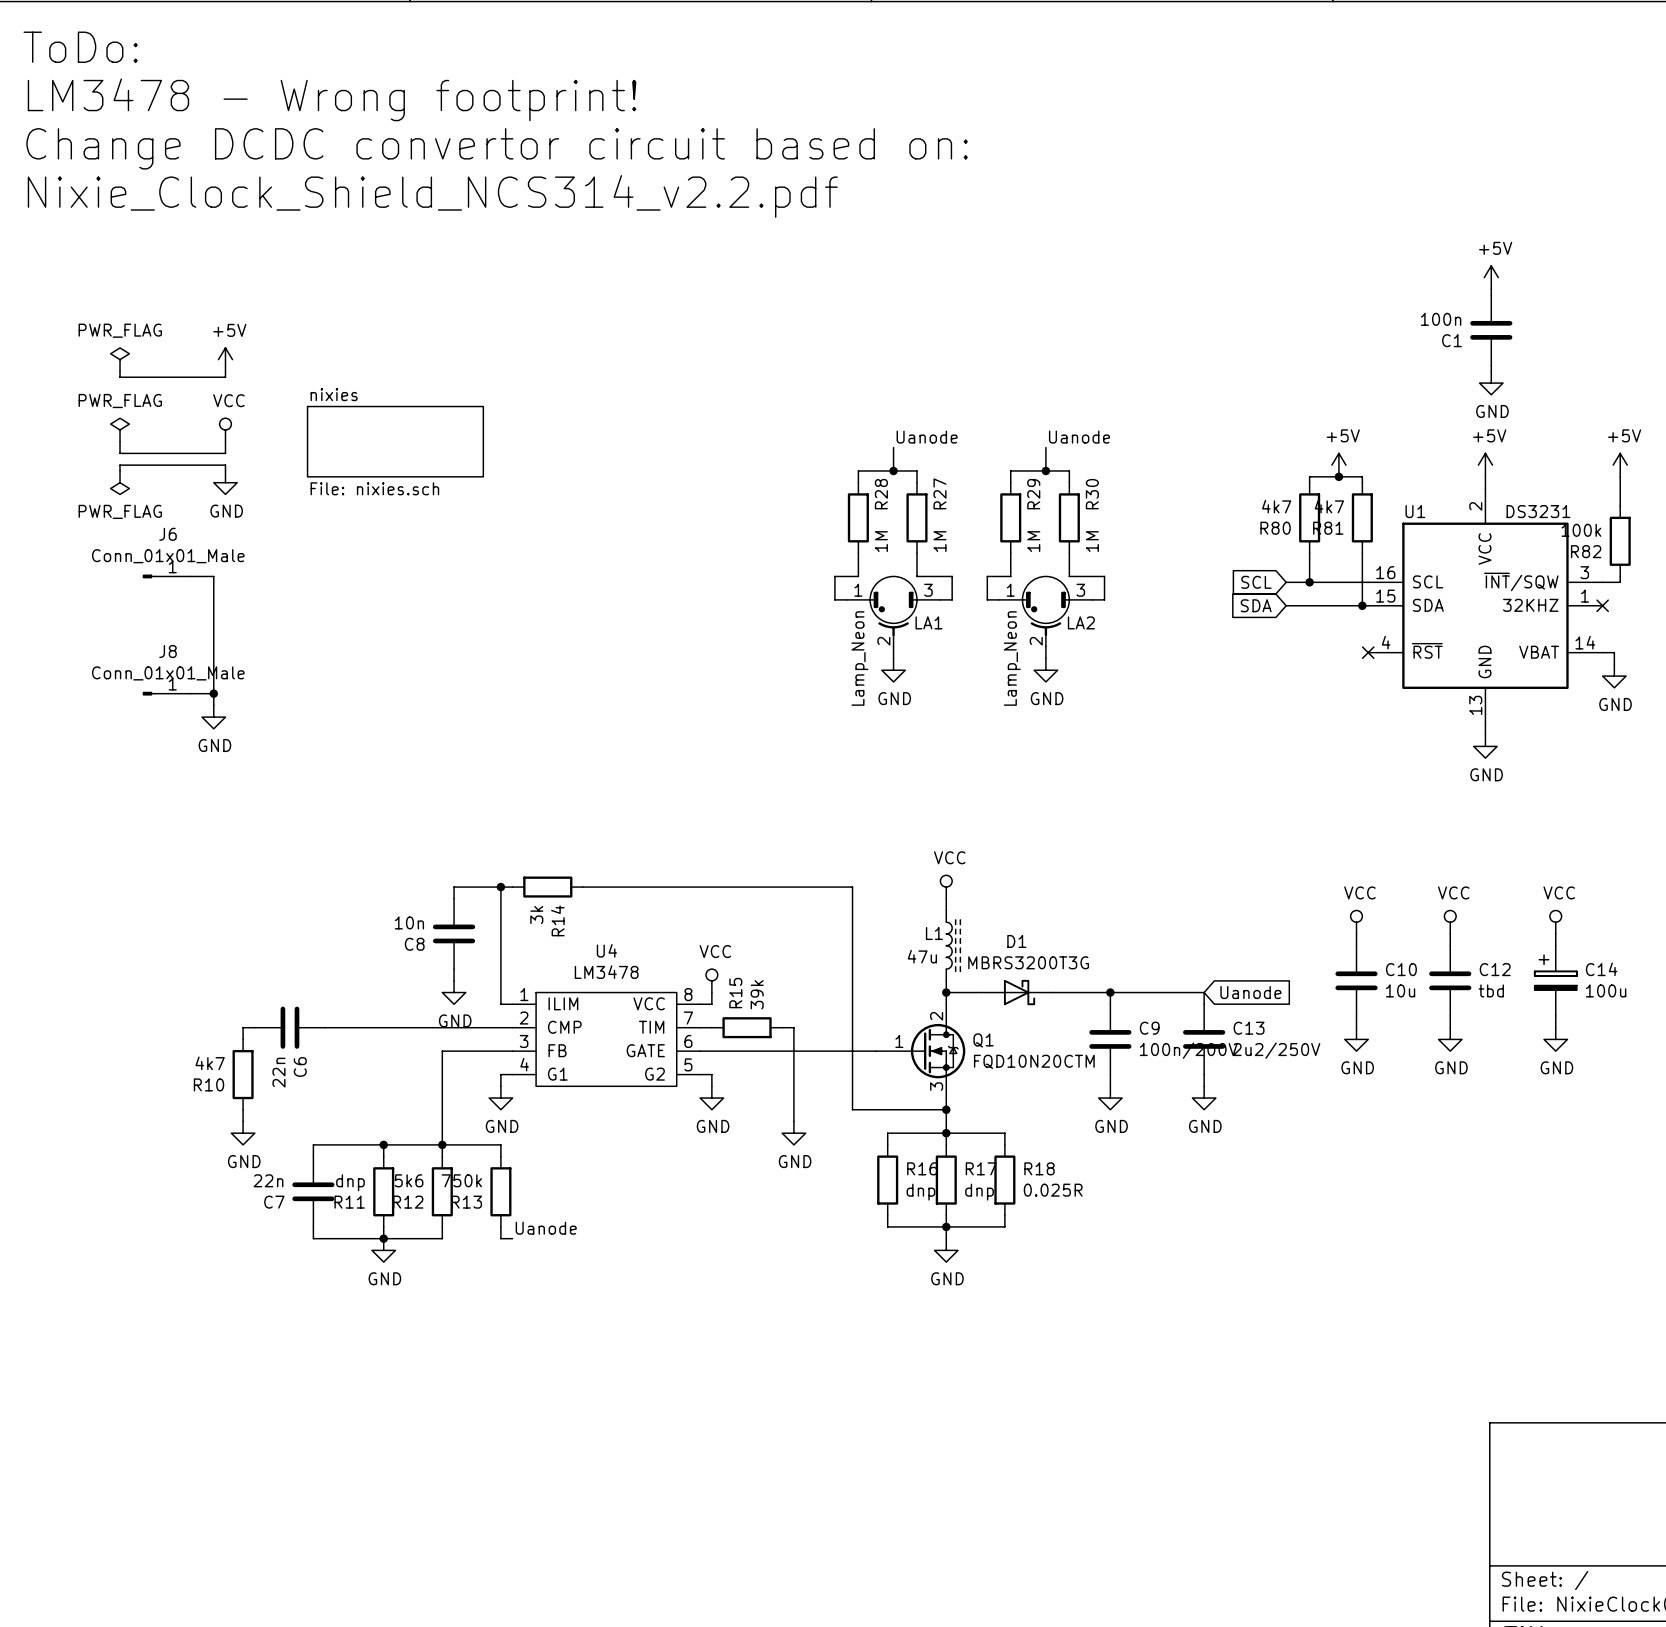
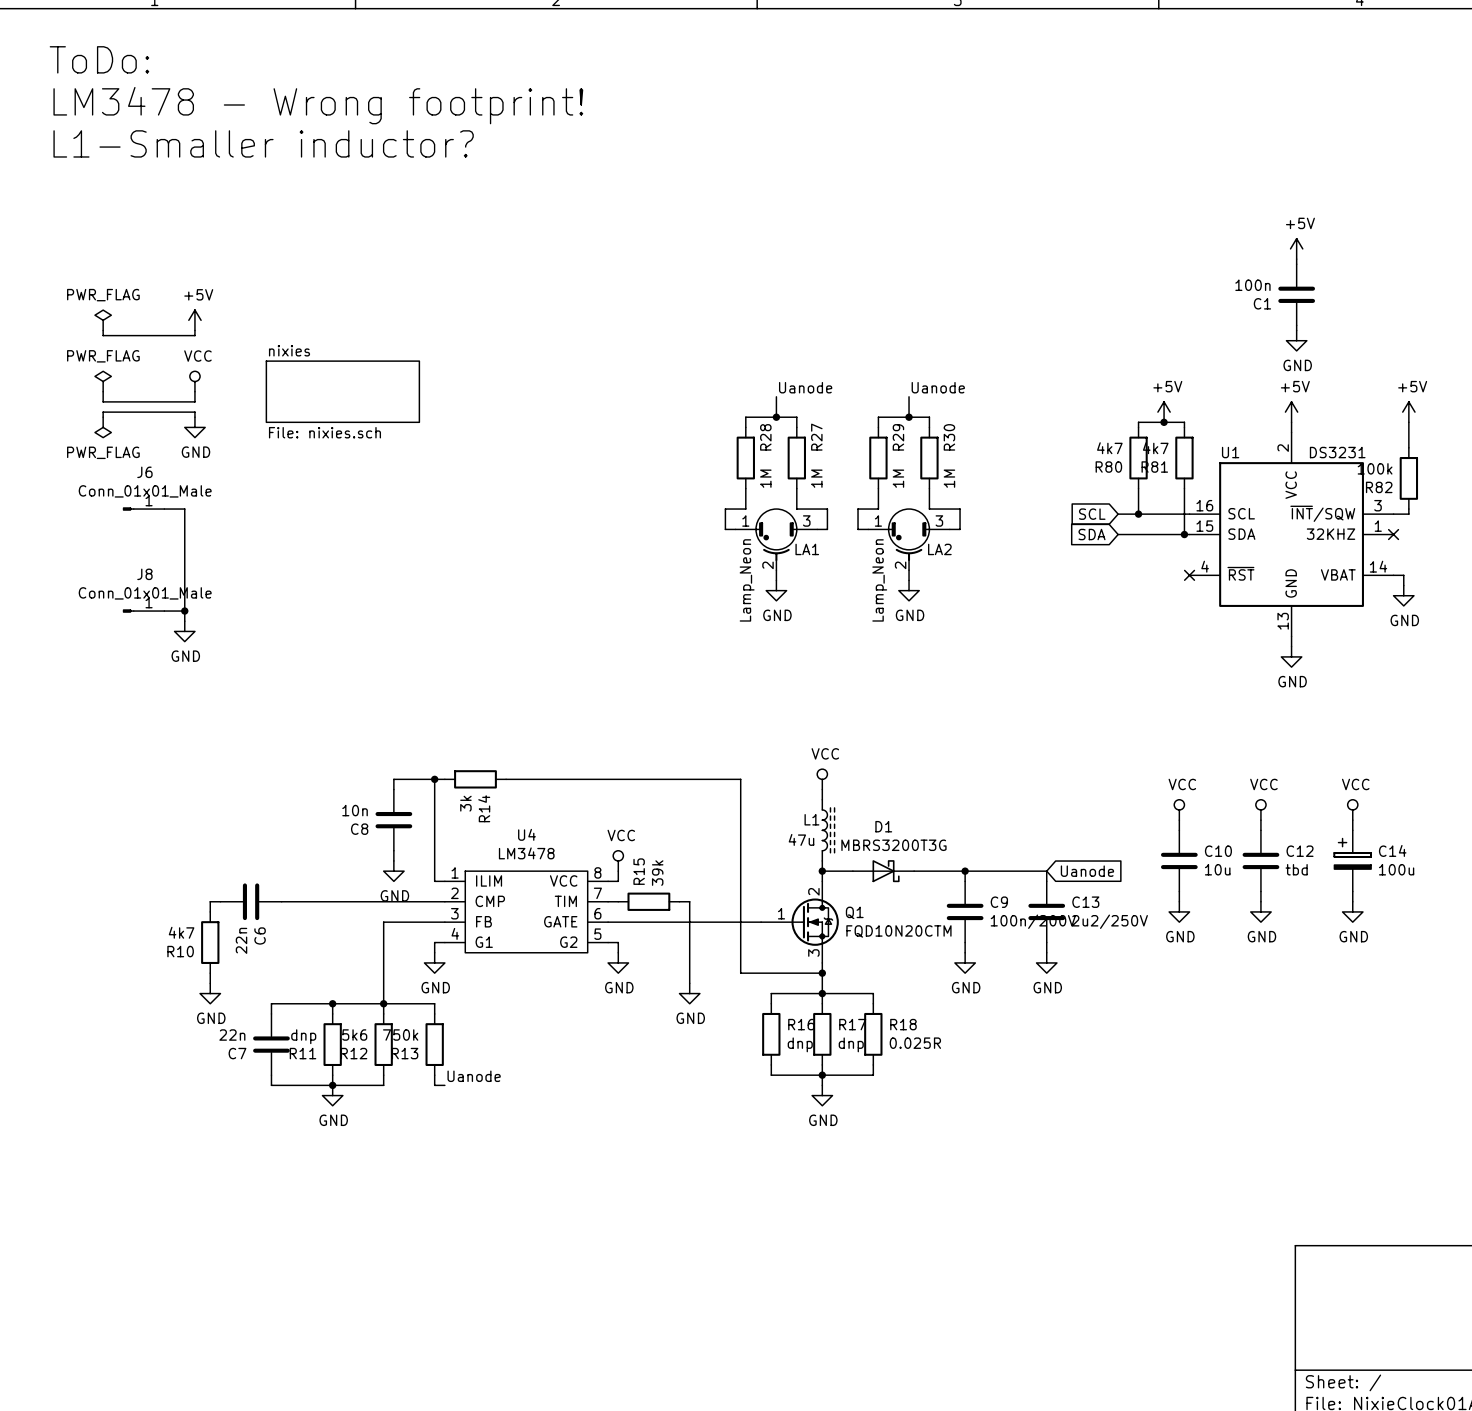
text position: ToDo: (80, 47) -> ToDo: (99, 59)
text position: LM3478 - Wrong footprint! (332, 99) -> LM3478 - Wrong footprint! (318, 105)
text: Change DCDC convertor circuit based on: (497, 148) -> none
text: none -> L1-Smaller inductor? (263, 143)
text: Nixie_Clock_Shield_NCS314_v2.2.pdf (432, 196) -> none

